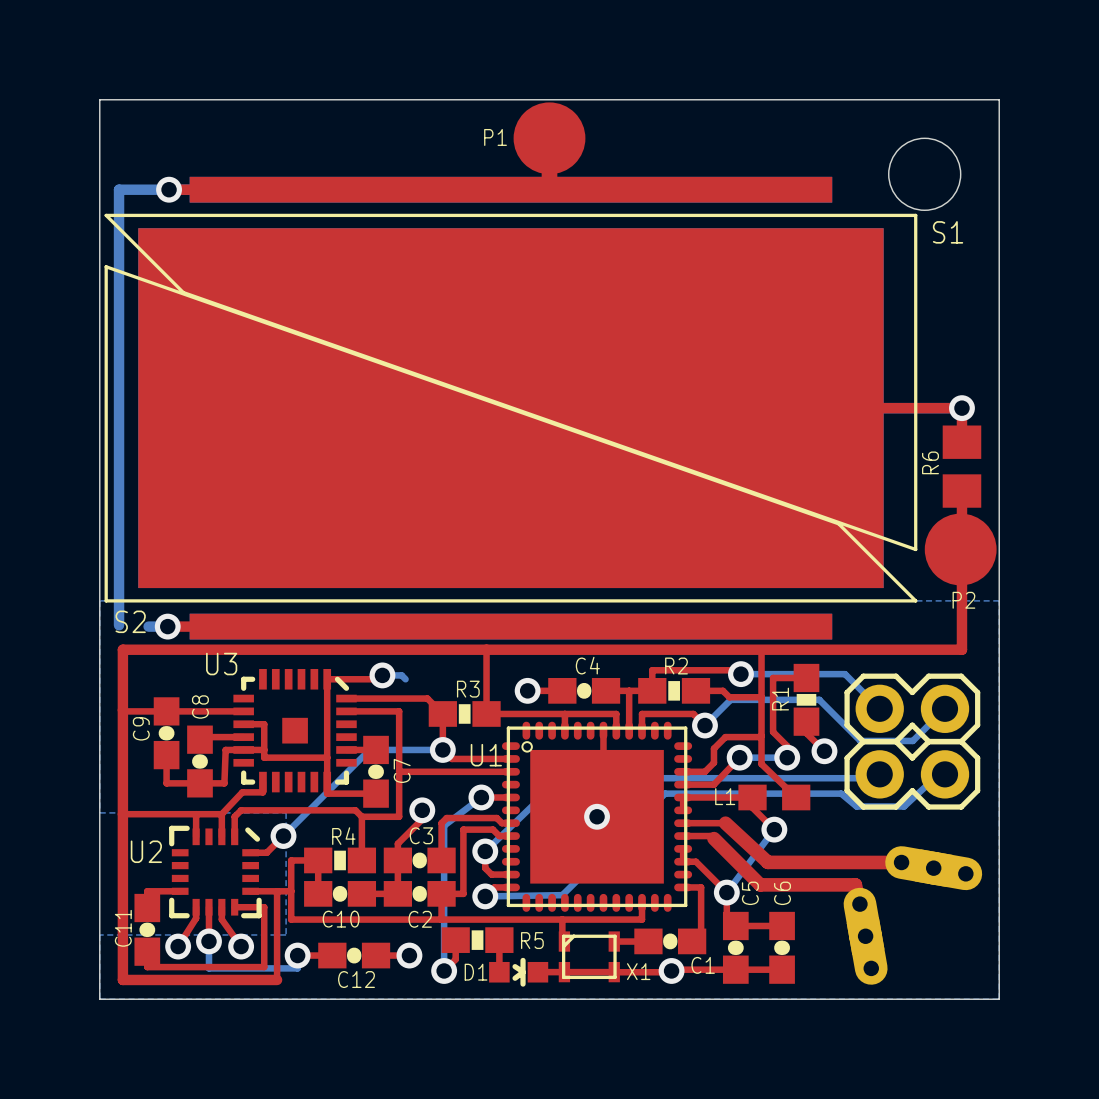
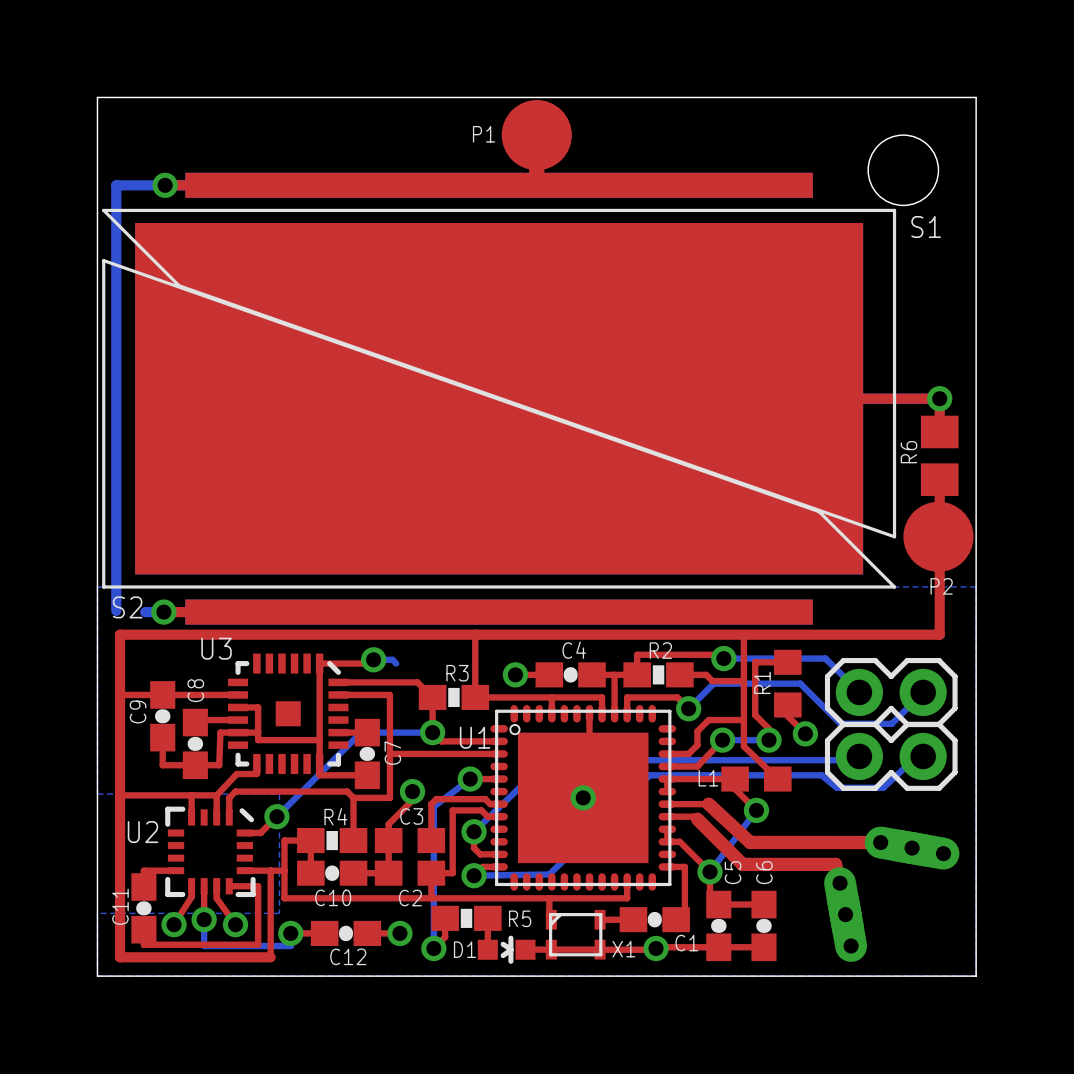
R1 footprint: [793, 663, 820, 736] -> [774, 649, 802, 718]
C3 footprint: [383, 847, 456, 874] -> [374, 828, 446, 854]
C2 footprint: [383, 881, 456, 907] -> [374, 860, 446, 886]

